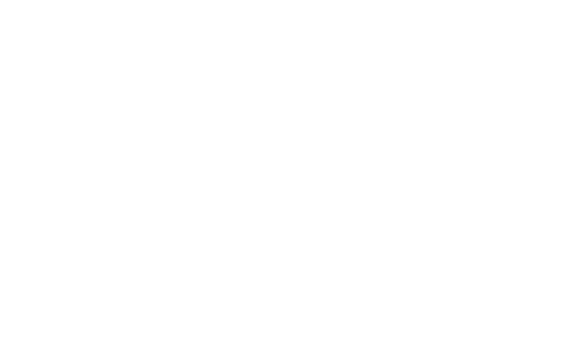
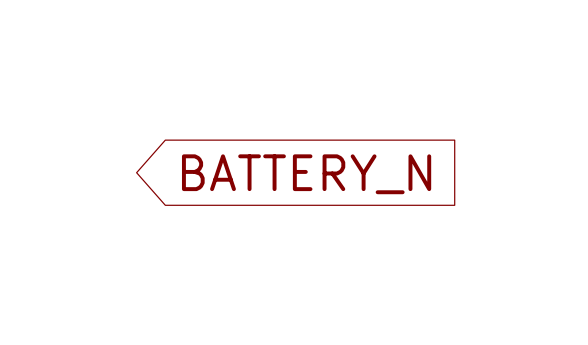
global label: none -> BATTERY_N (306, 174)

